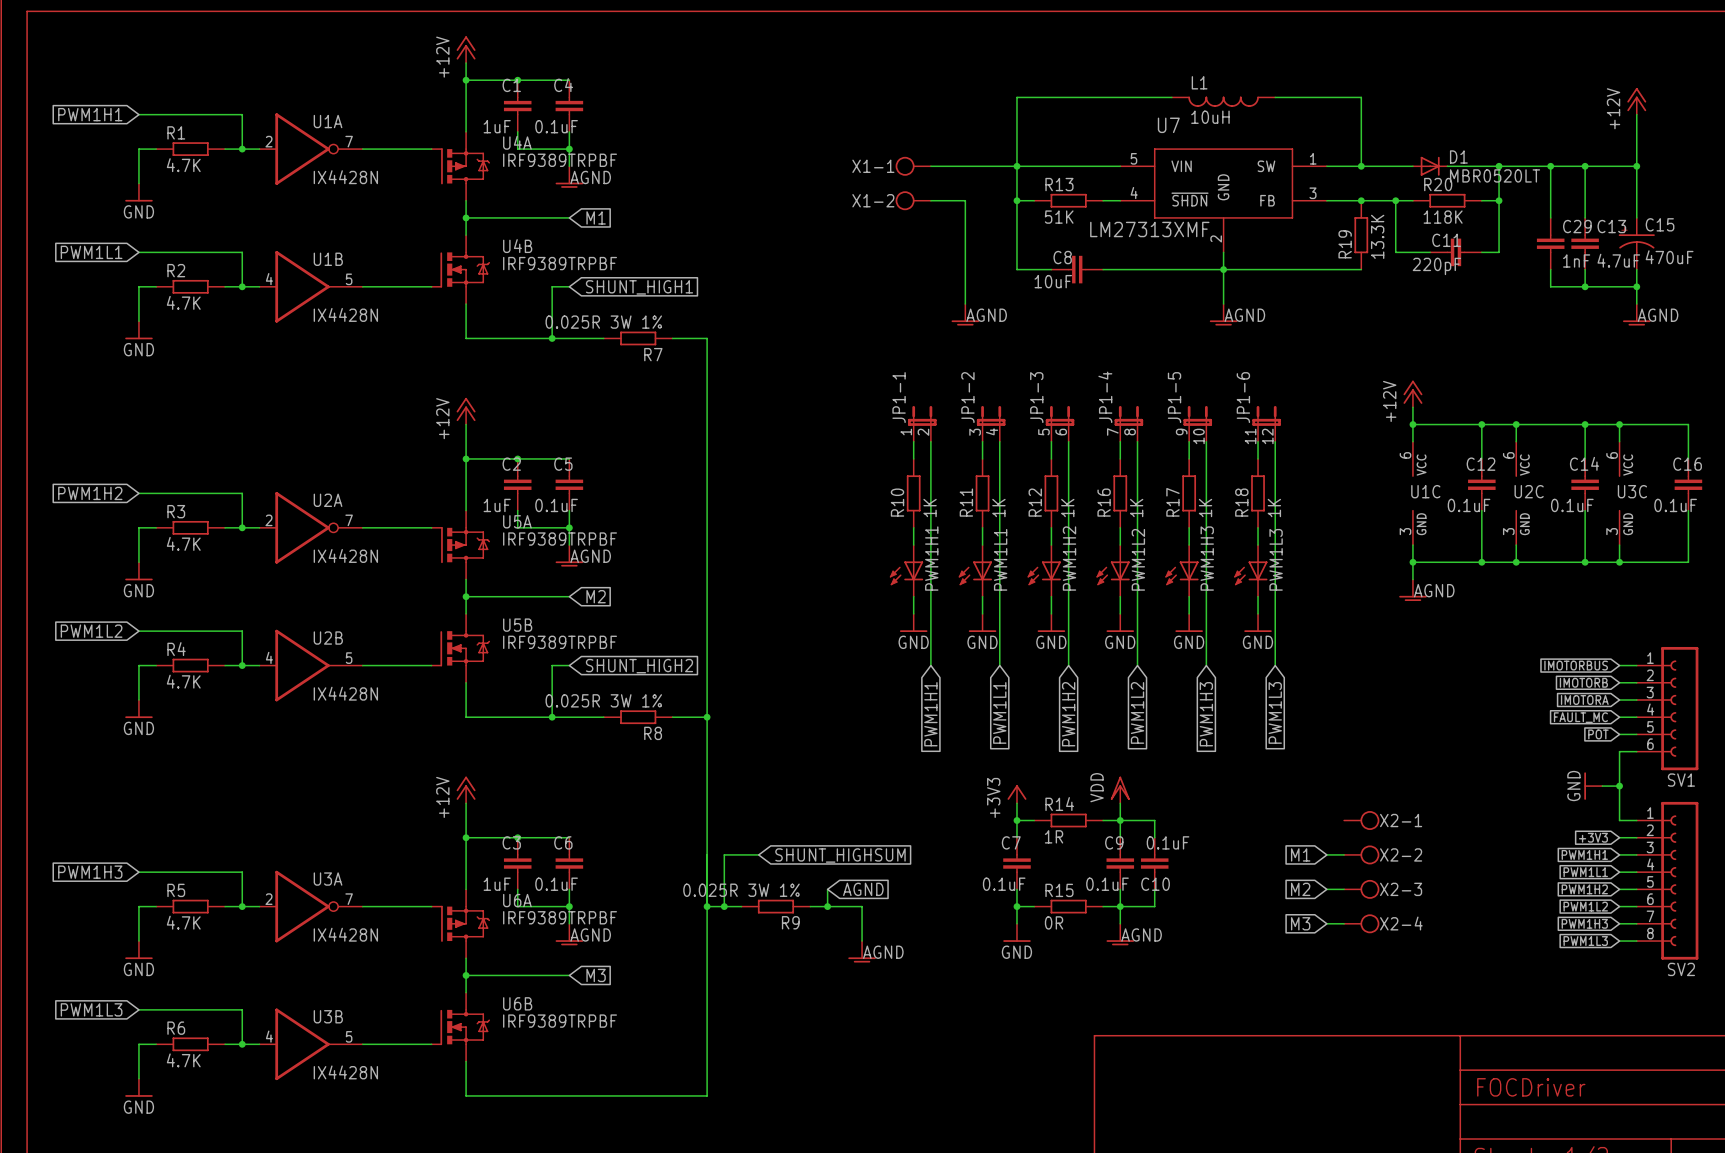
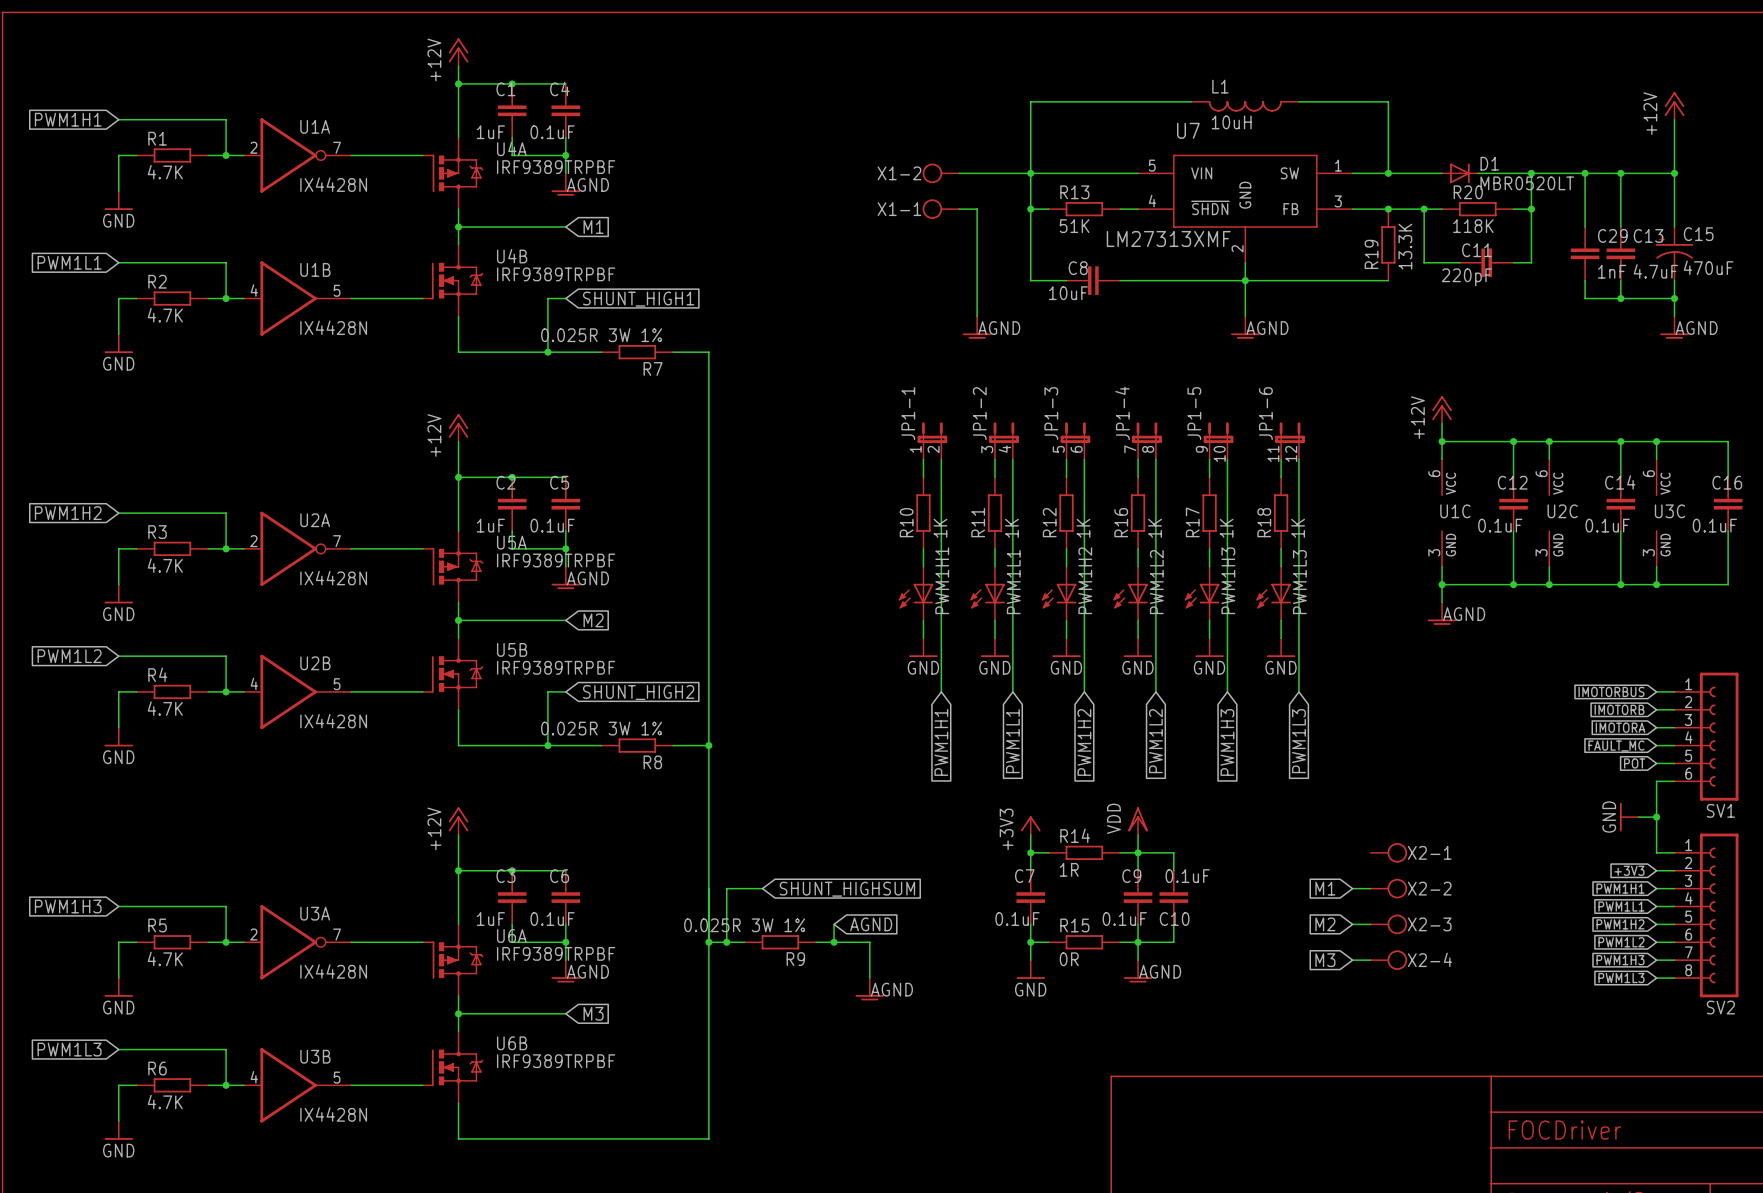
X1-1 position: (913, 166) -> (940, 209)
X1-2 position: (913, 200) -> (940, 173)

